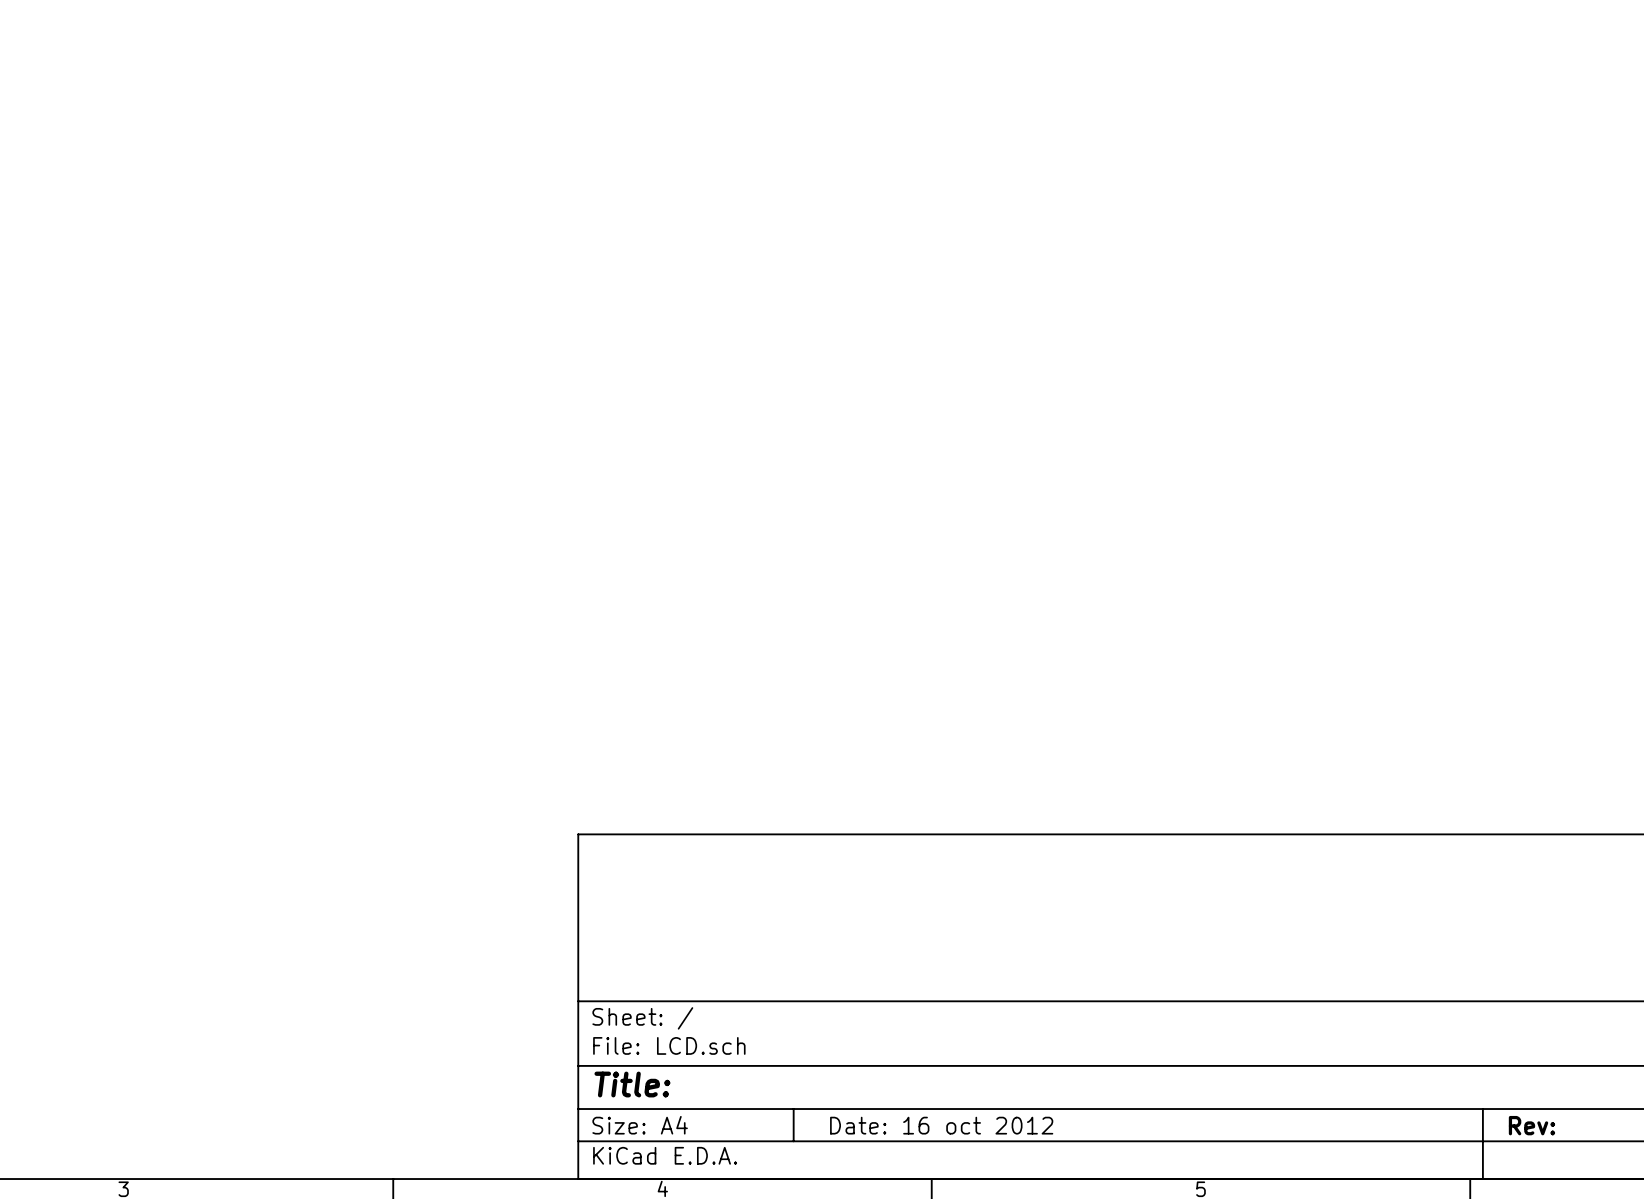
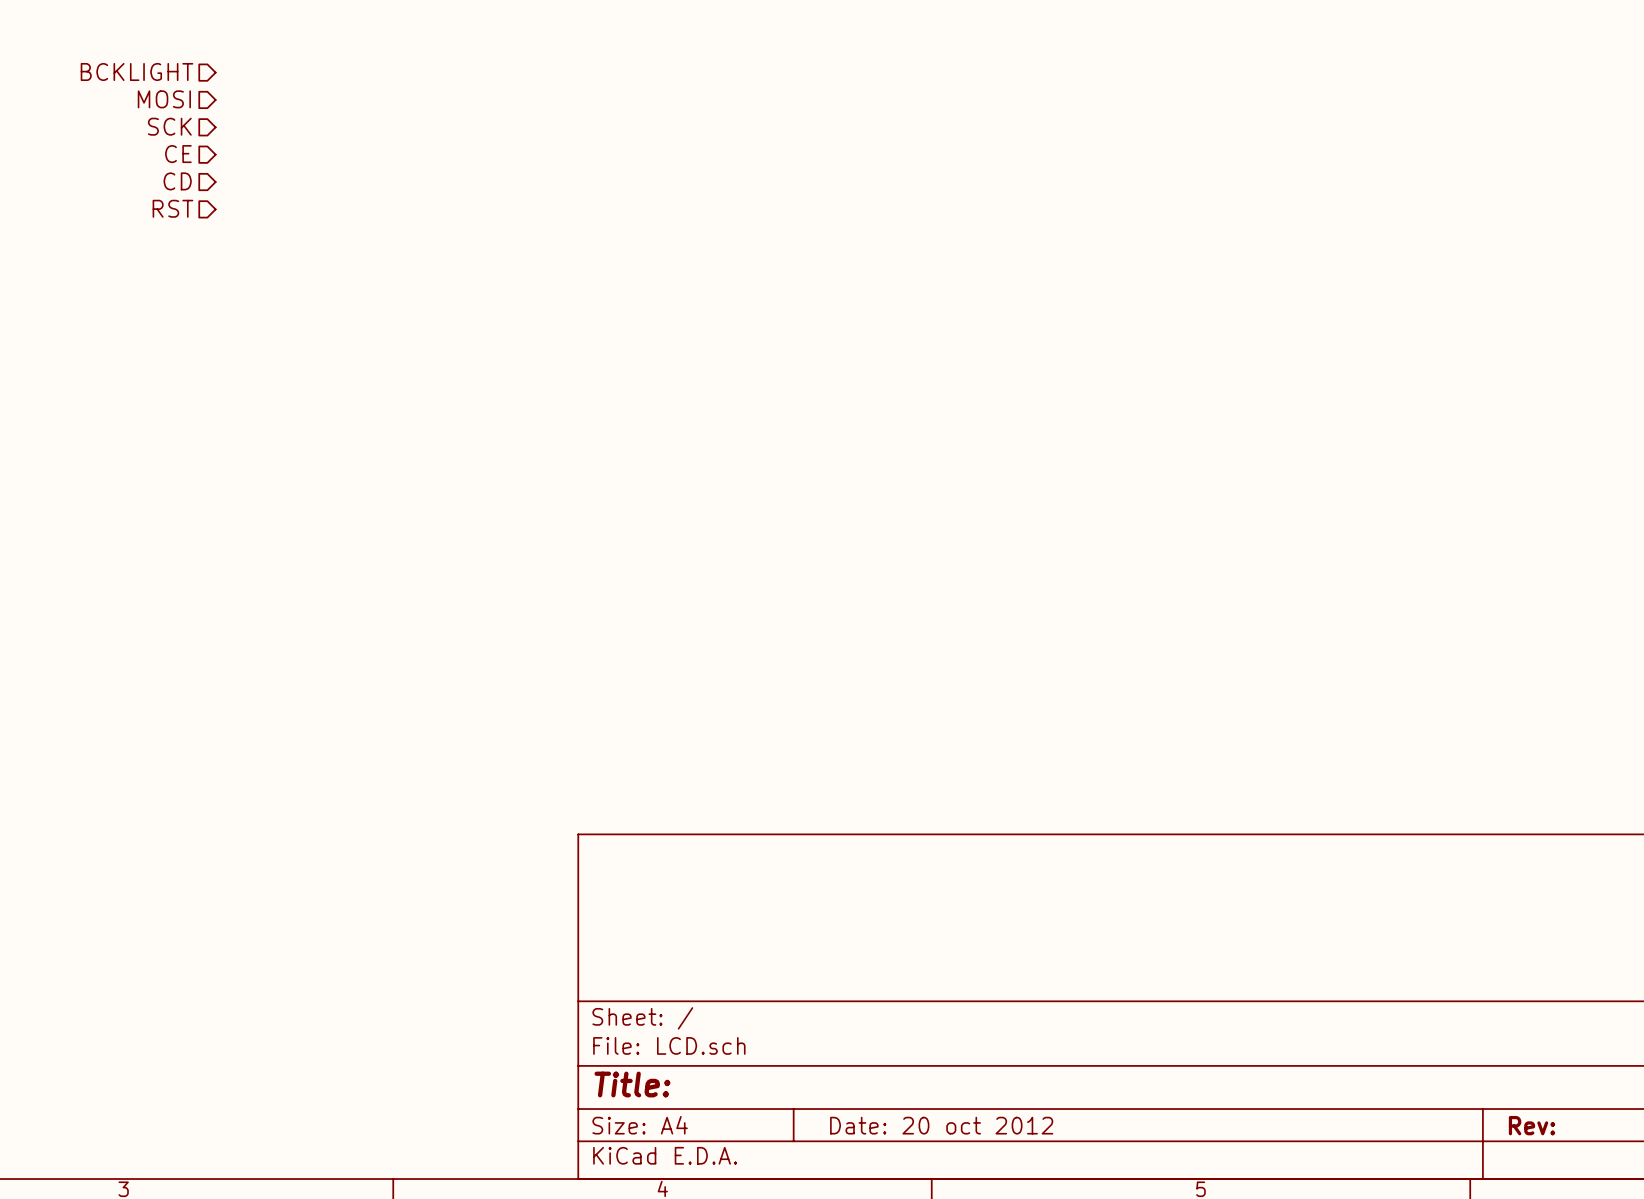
hierarchical label: none -> BCKLIGHT (137, 71)
hierarchical label: none -> MOSI (164, 99)
hierarchical label: none -> SCK (169, 126)
hierarchical label: none -> CE (178, 154)
hierarchical label: none -> CD (177, 181)
hierarchical label: none -> RST (172, 208)
title block: Date: 16 oct 2012 (941, 1125) -> Date: 20 oct 2012 (941, 1125)

